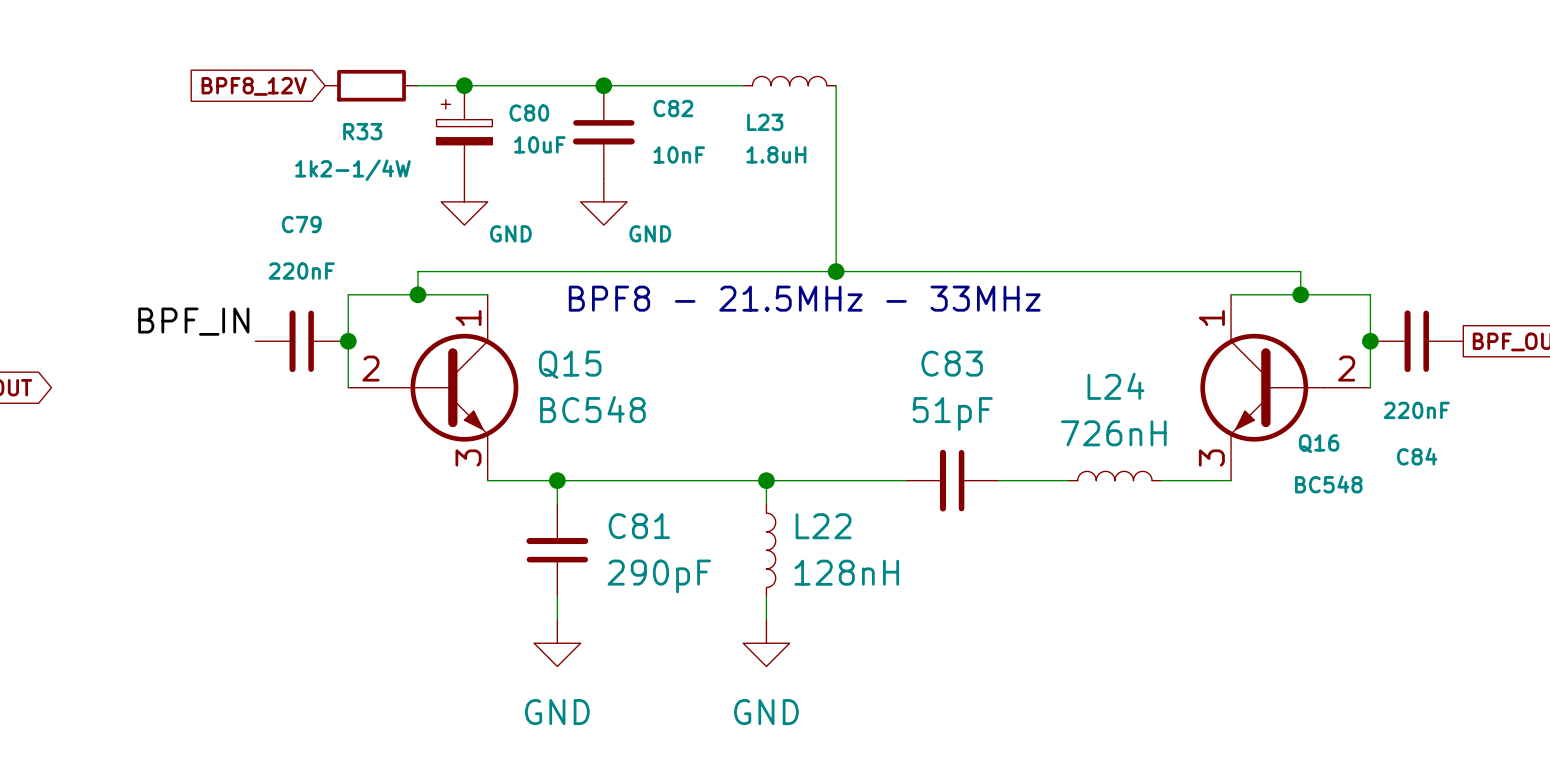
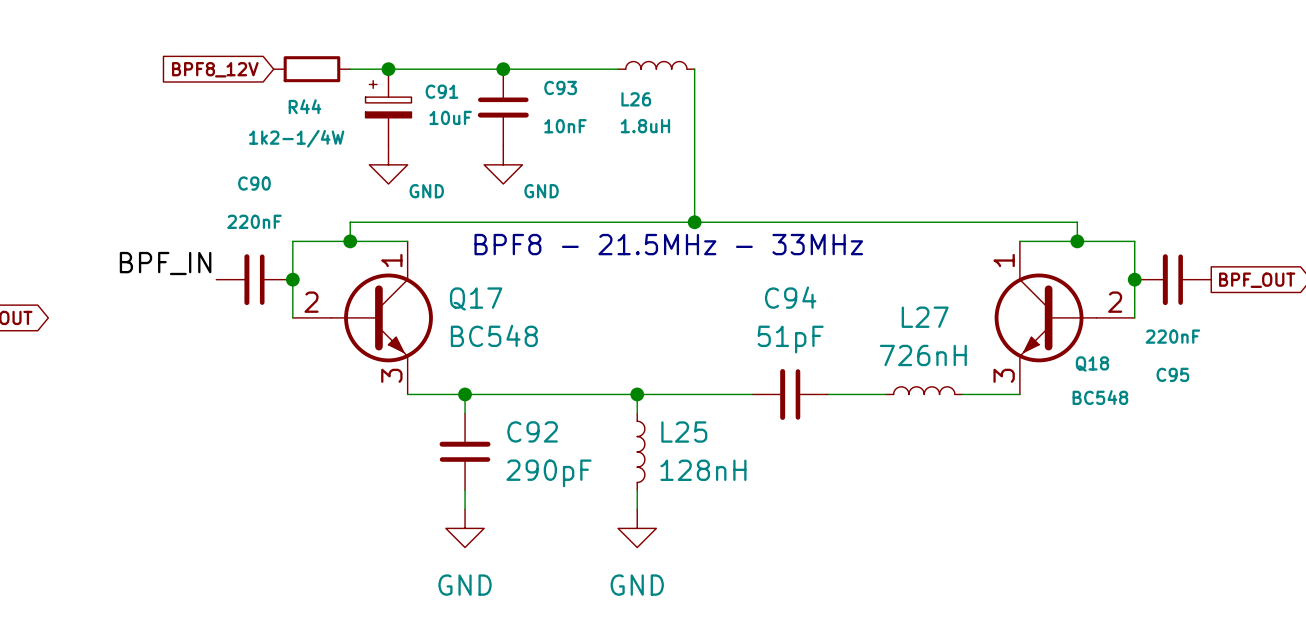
C82 name: C82 (673, 108) -> C93 (560, 87)
C80 name: C80 (529, 113) -> C91 (441, 91)
L23 name: L23 (765, 122) -> L26 (636, 99)
R33 name: R33 (362, 131) -> R44 (305, 106)
C79 name: C79 (301, 224) -> C90 (254, 183)
C83 name: C83 (952, 363) -> C94 (790, 297)
Q15 name: Q15 (570, 364) -> Q17 (476, 298)
L24 name: L24 (1115, 386) -> L27 (925, 317)
Q16 name: Q16 (1319, 443) -> Q18 (1092, 363)
C84 name: C84 (1417, 456) -> C95 (1172, 374)
C81 name: C81 (639, 526) -> C92 (532, 431)
L22 name: L22 (823, 526) -> L25 (684, 432)

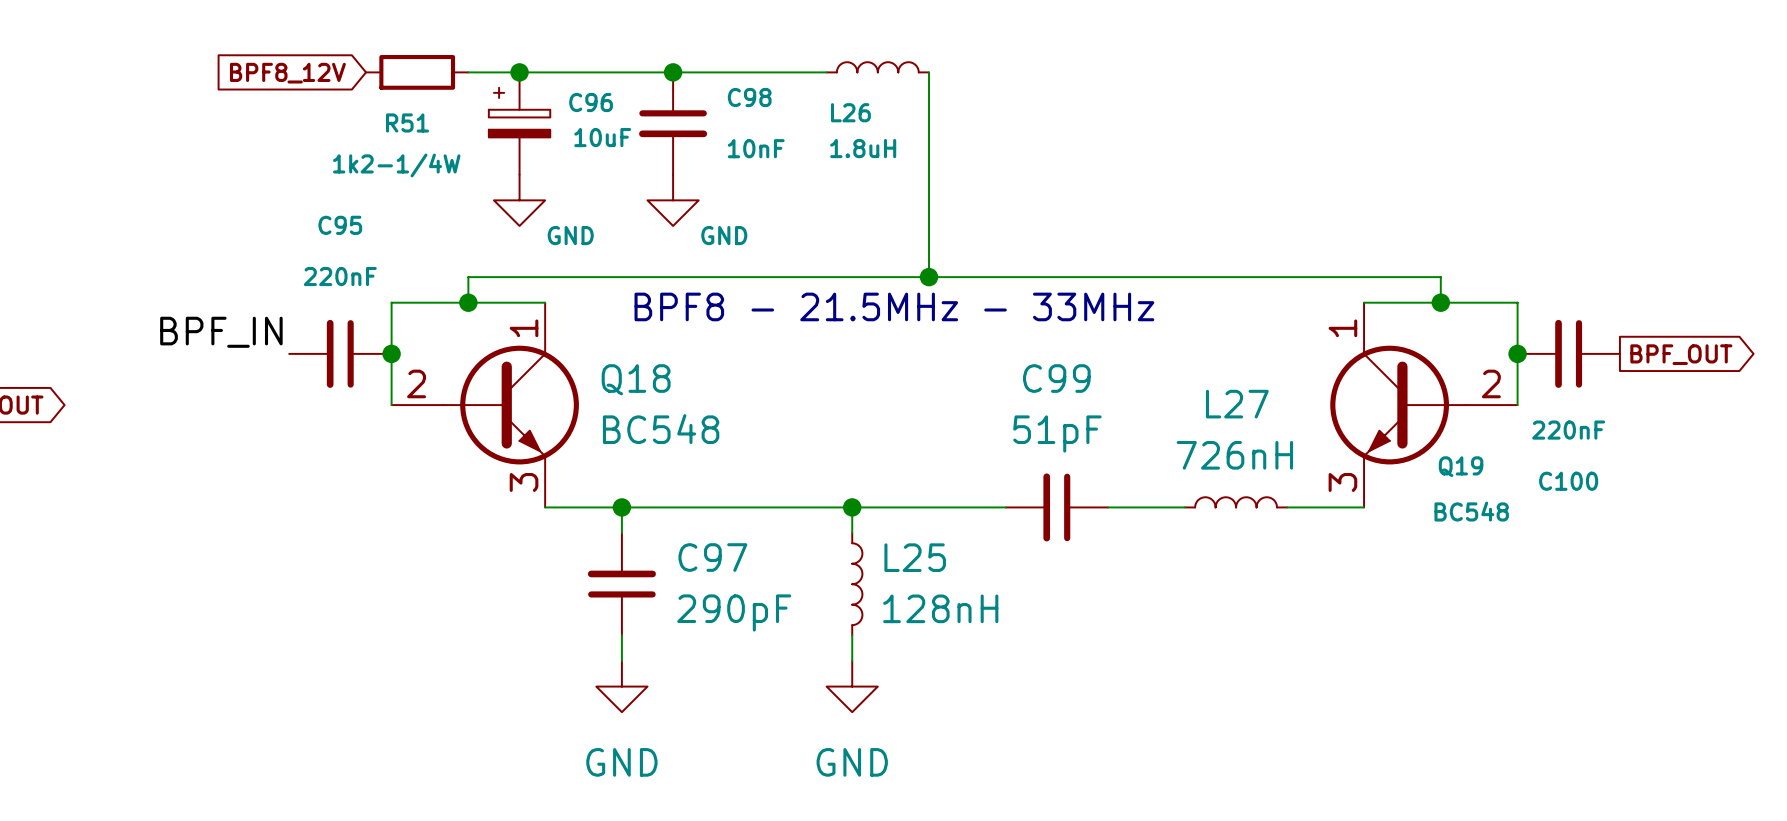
C93 name: C93 (560, 87) -> C98 (749, 97)
C91 name: C91 (441, 91) -> C96 (591, 102)
R44 name: R44 (305, 106) -> R51 (407, 122)
C90 name: C90 (254, 183) -> C95 (340, 225)
C94 name: C94 (790, 297) -> C99 (1056, 378)
Q17 name: Q17 (476, 298) -> Q18 (636, 379)
Q18 name: Q18 (1092, 363) -> Q19 (1461, 466)
C95 name: C95 (1172, 374) -> C100 (1568, 481)
C92 name: C92 (532, 431) -> C97 (712, 557)

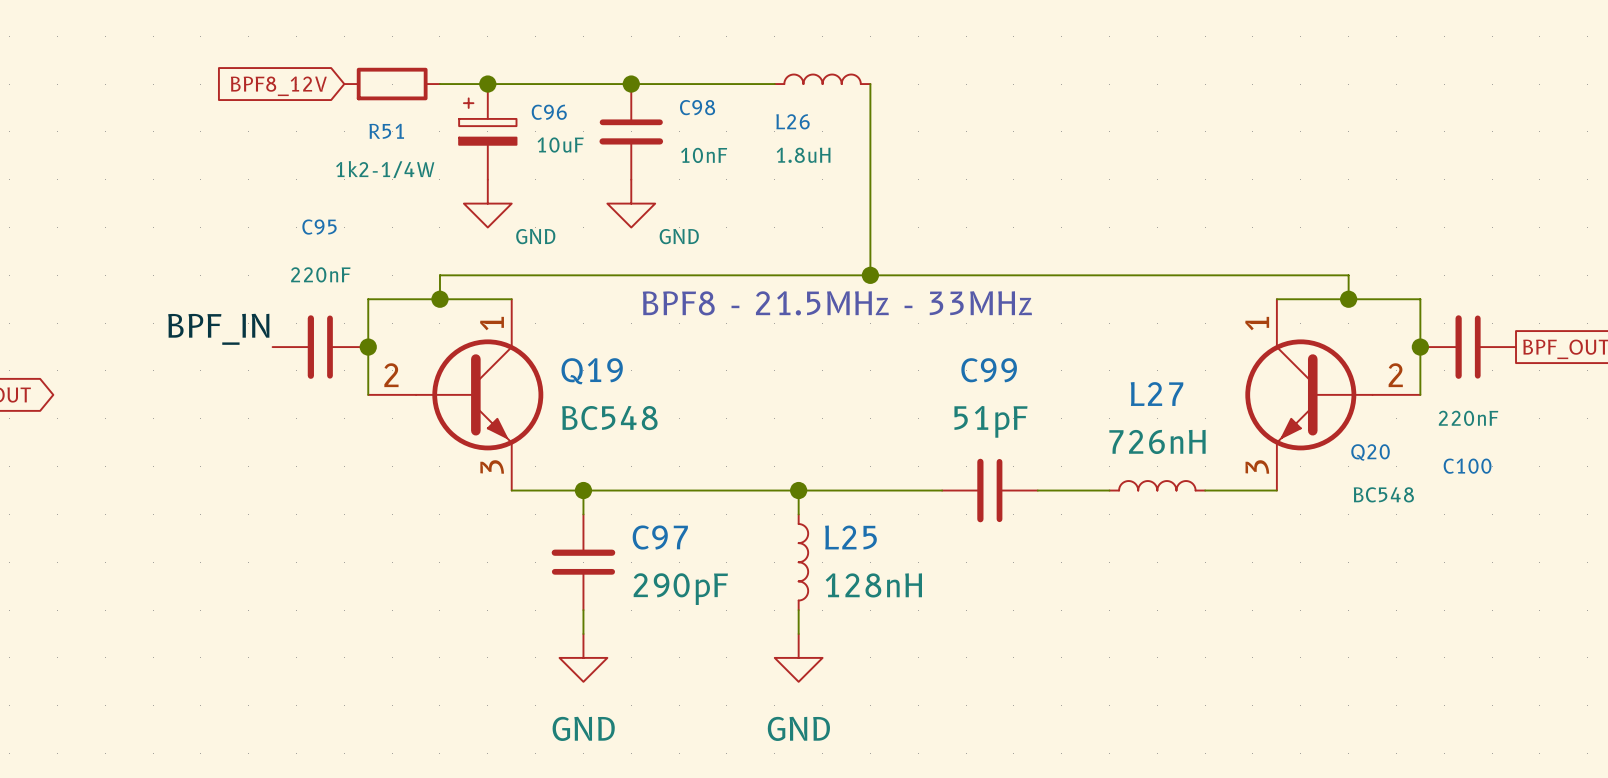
Q18 name: Q18 (636, 379) -> Q19 (592, 371)
Q19 name: Q19 (1461, 466) -> Q20 (1370, 452)

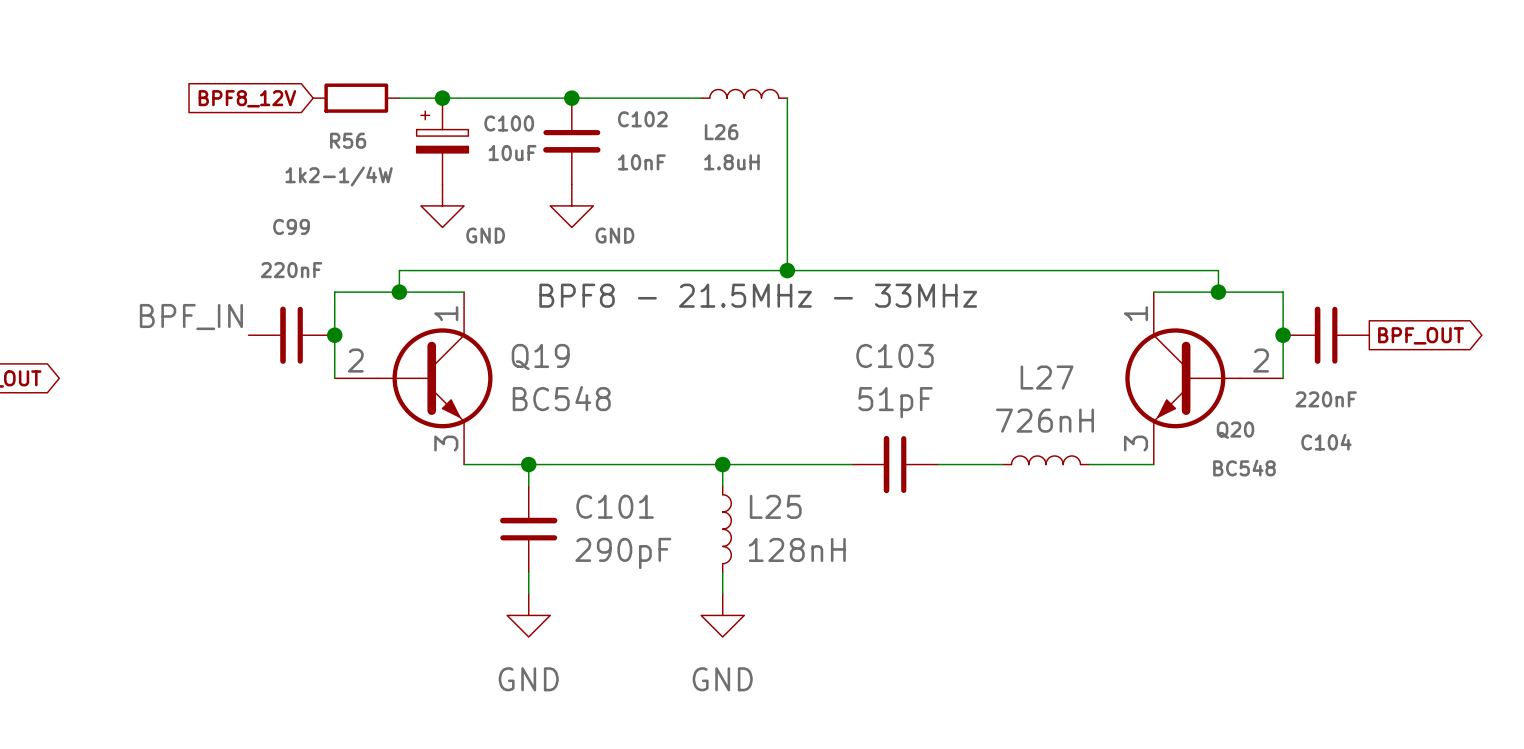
C98 name: C98 (697, 107) -> C102 (642, 119)
C96 name: C96 (549, 112) -> C100 (509, 123)
R51 name: R51 (386, 131) -> R56 (348, 140)
C95 name: C95 (319, 227) -> C99 (291, 226)
C99 name: C99 (989, 370) -> C103 (895, 355)
C100 name: C100 (1467, 466) -> C104 (1326, 442)
C97 name: C97 (660, 537) -> C101 (615, 506)

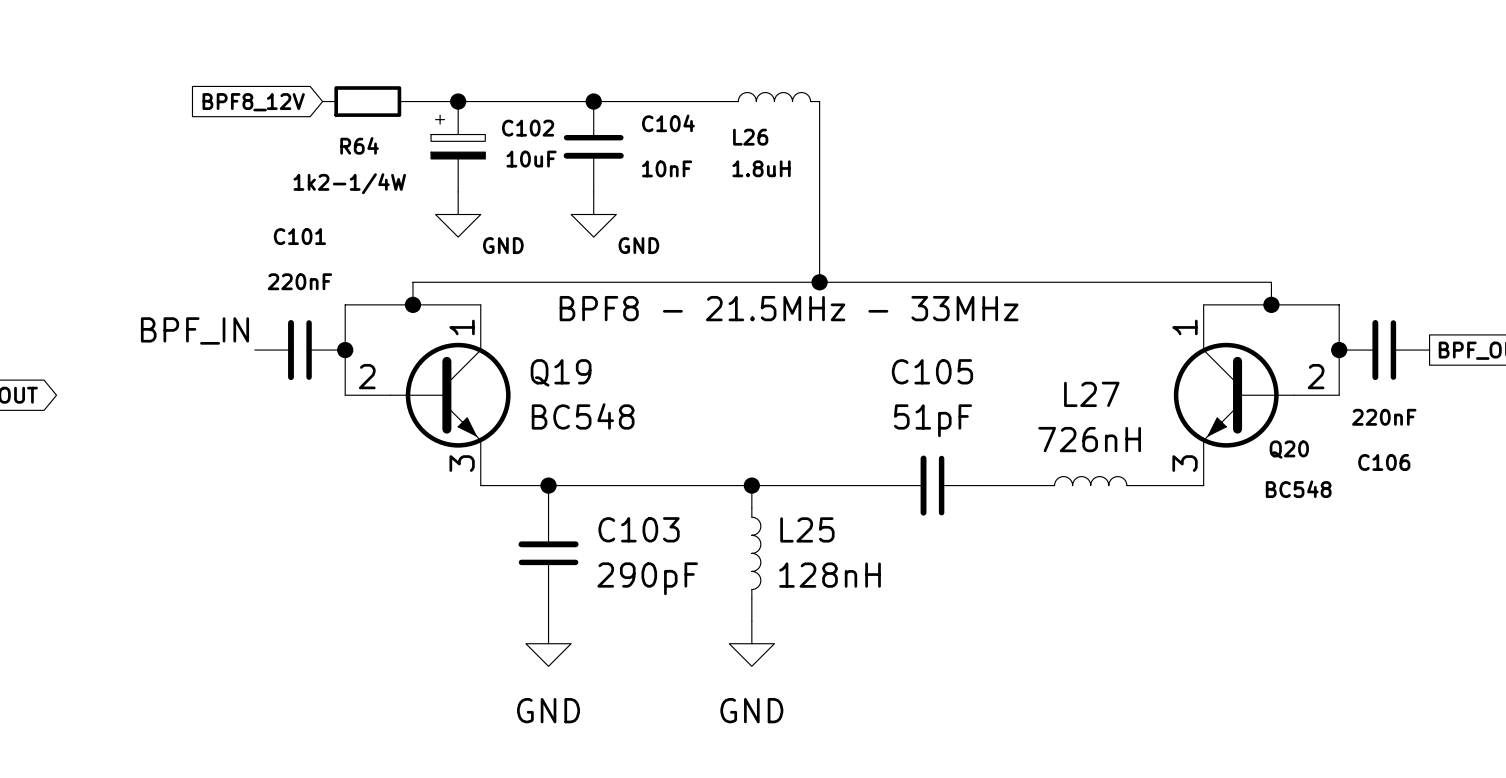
C102 name: C102 (642, 119) -> C104 (668, 123)
C100 name: C100 (509, 123) -> C102 (528, 128)
R56 name: R56 (348, 140) -> R64 (359, 145)
C99 name: C99 (291, 226) -> C101 (299, 236)
C103 name: C103 (895, 355) -> C105 (932, 371)
C104 name: C104 (1326, 442) -> C106 (1384, 462)
C101 name: C101 (615, 506) -> C103 (639, 529)

